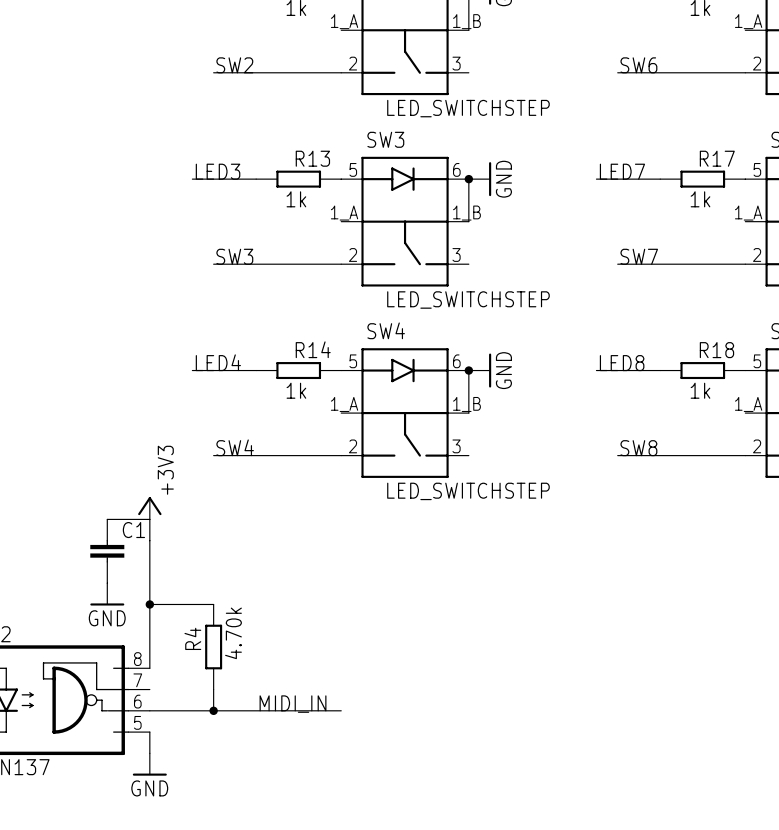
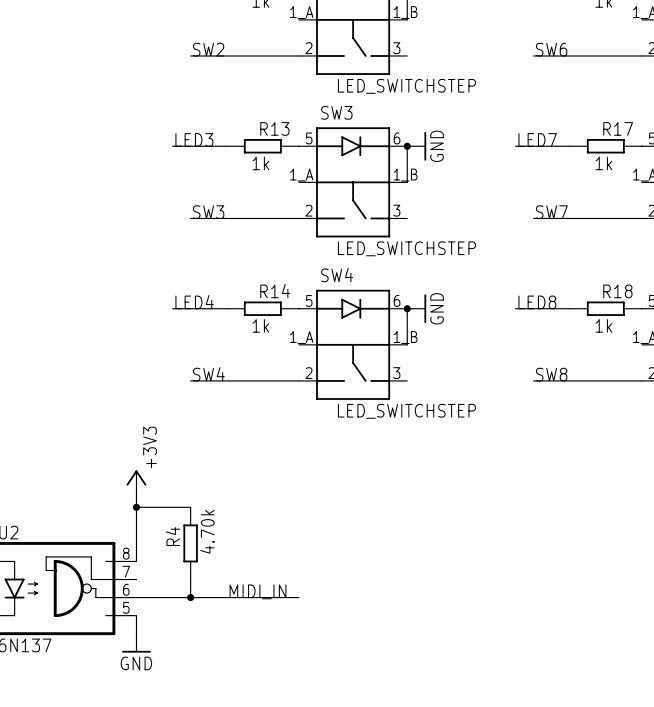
power symbol position: +3V3 (149, 508) -> +3V3 (136, 479)
wire: (107, 519) (149, 519) (149, 583) -> none
C1: (107, 551) -> none
power symbol: GND (107, 594) -> none

